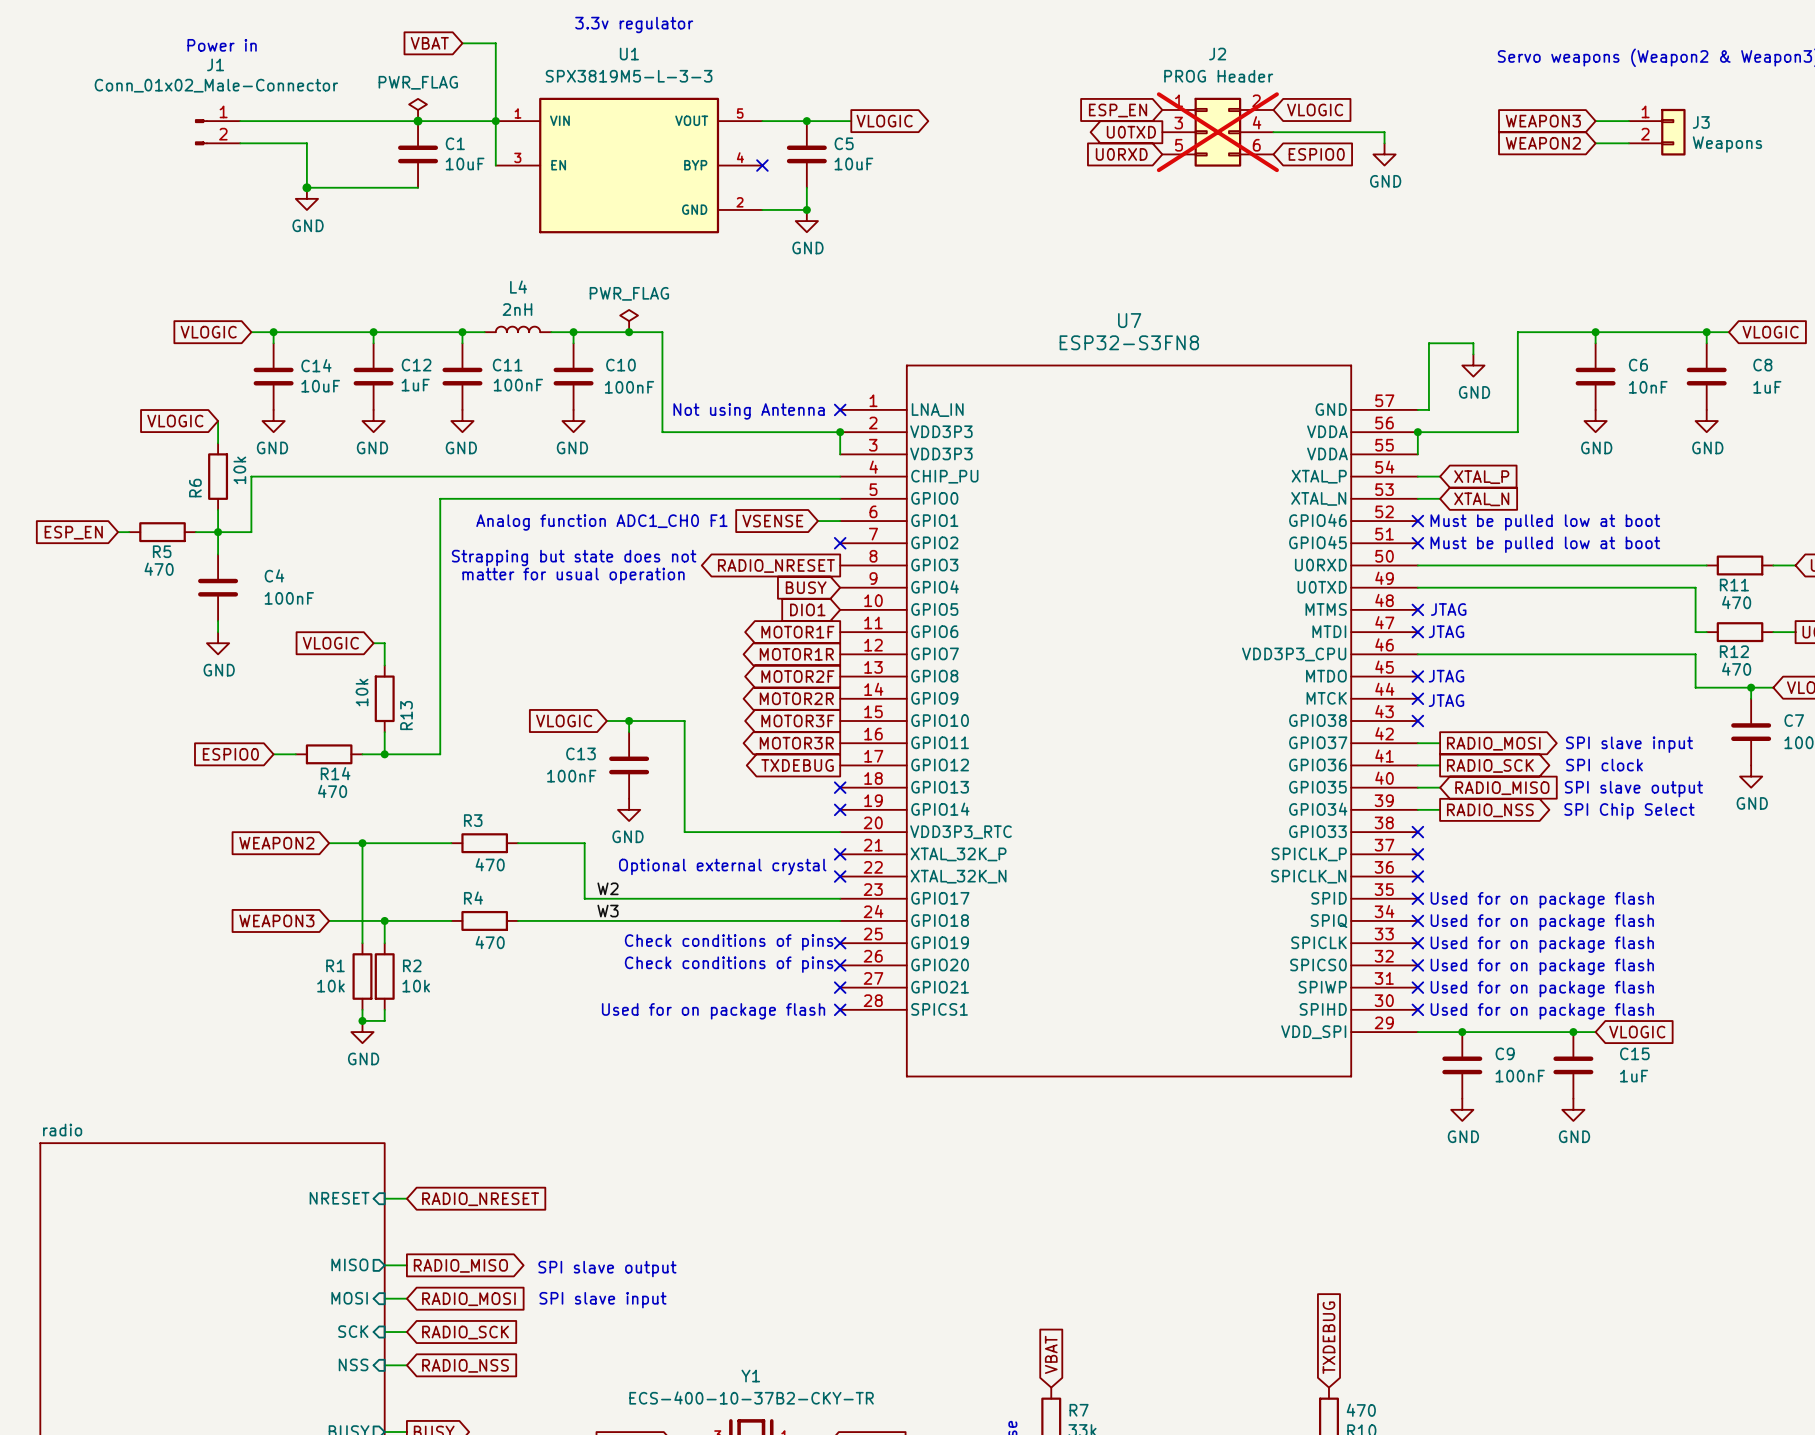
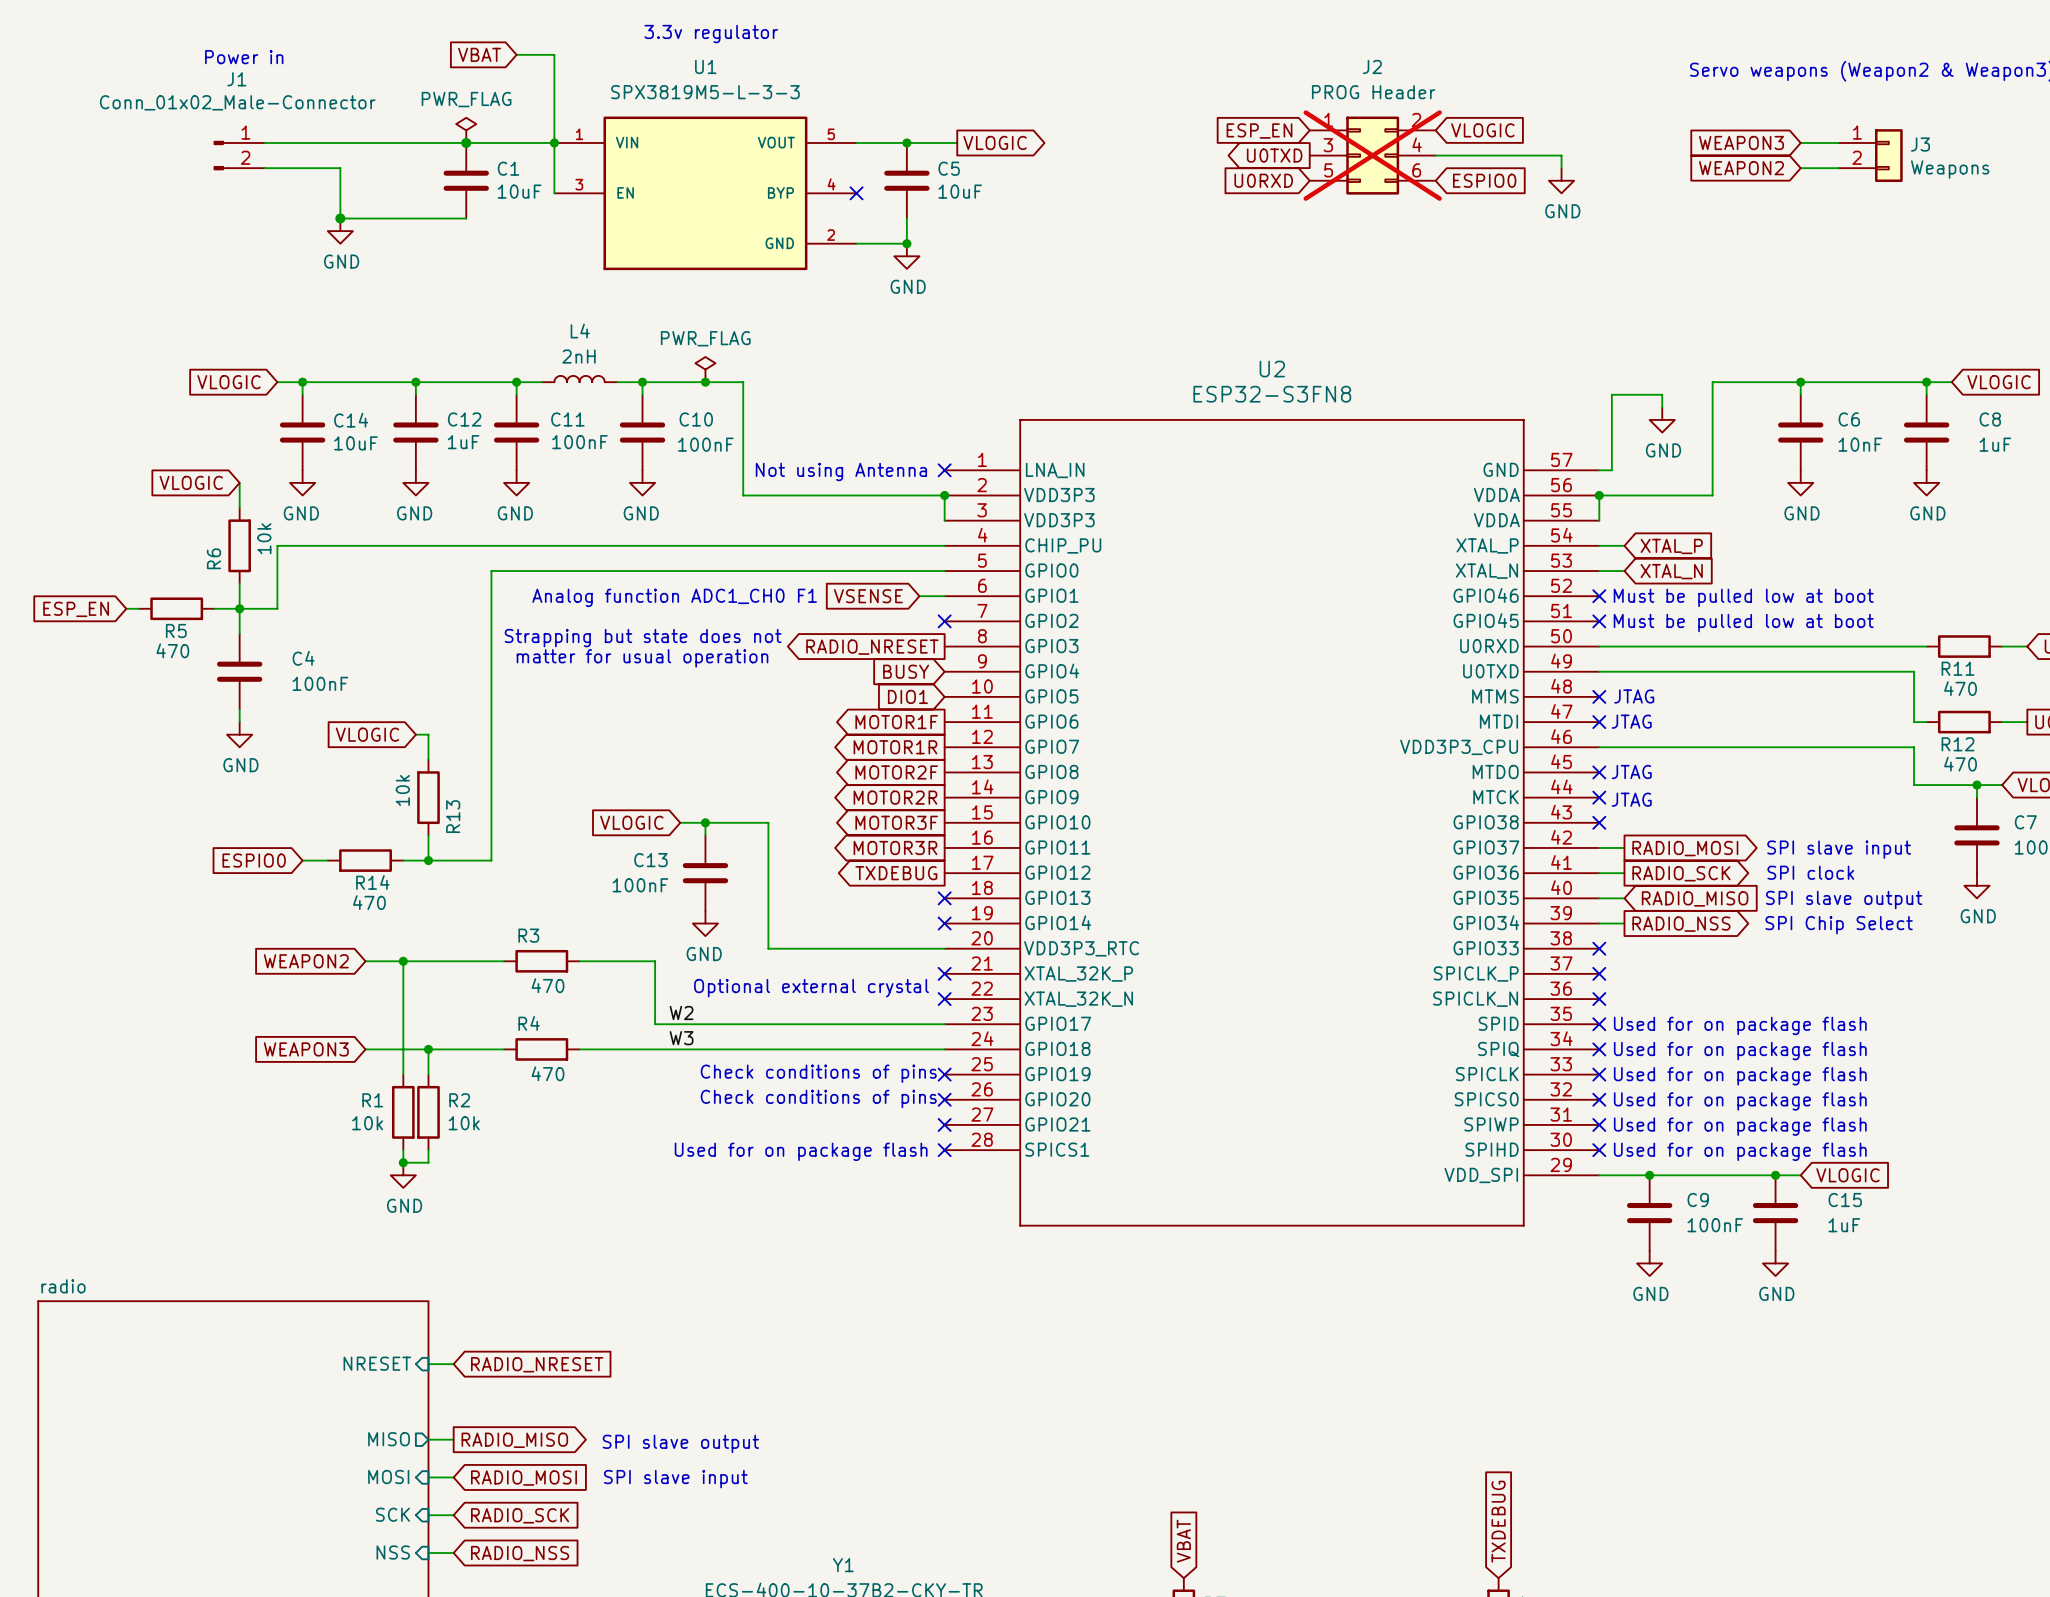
U7 name: U7 (1129, 320) -> U2 (1272, 369)

